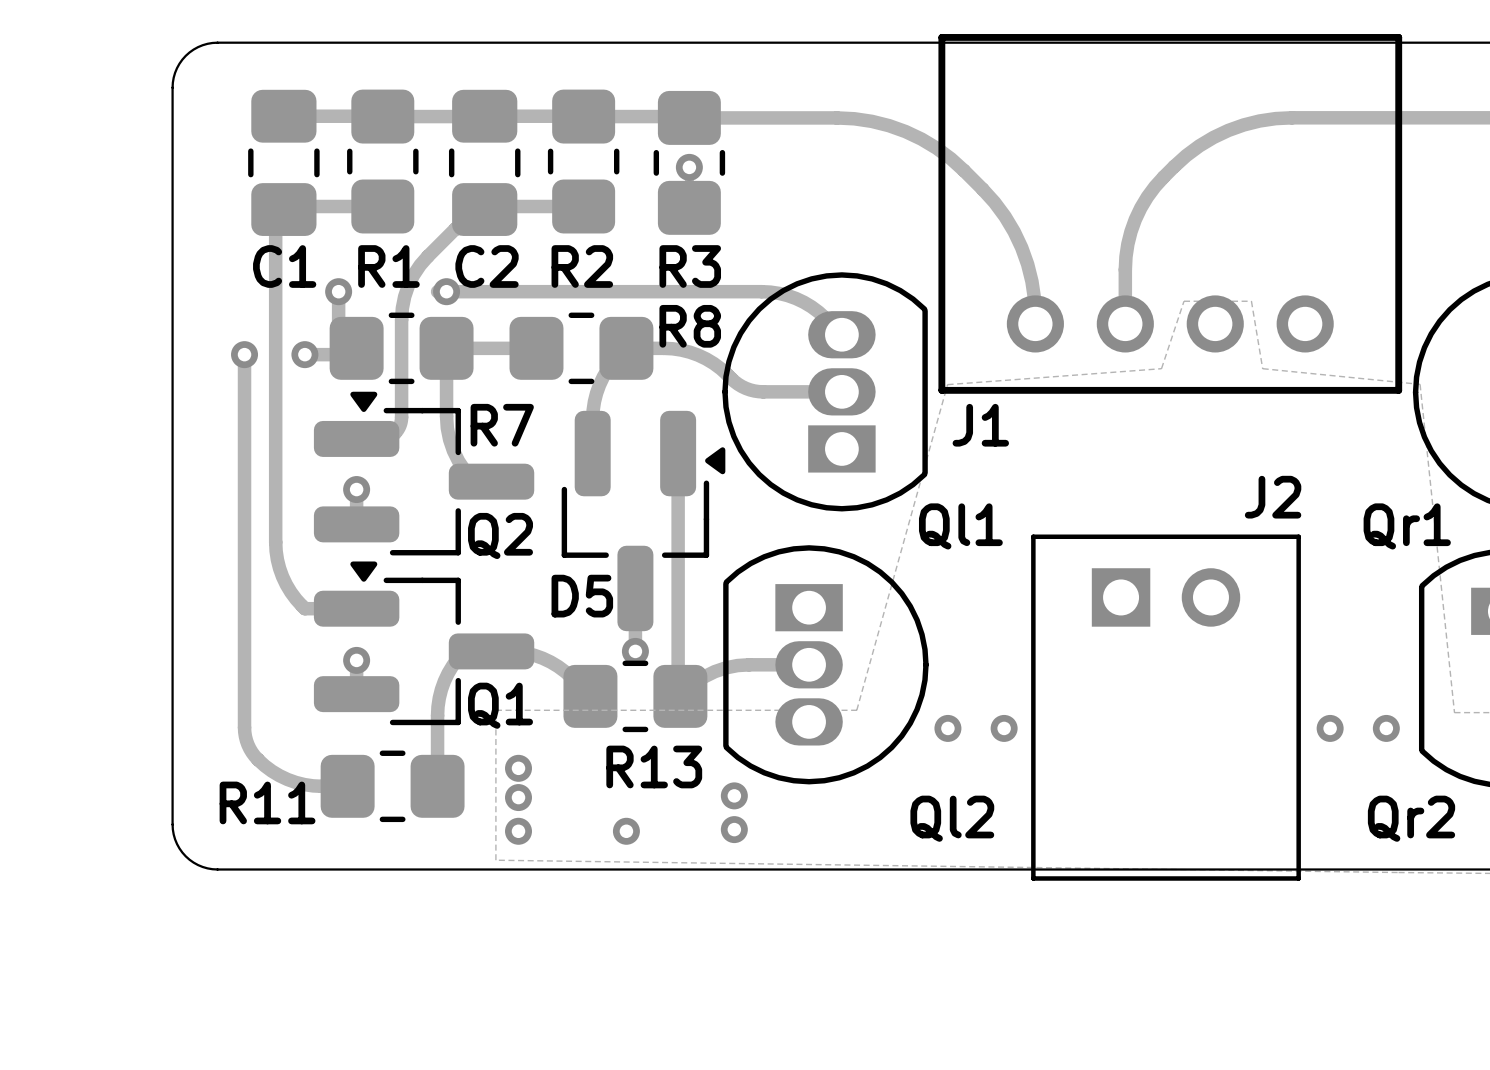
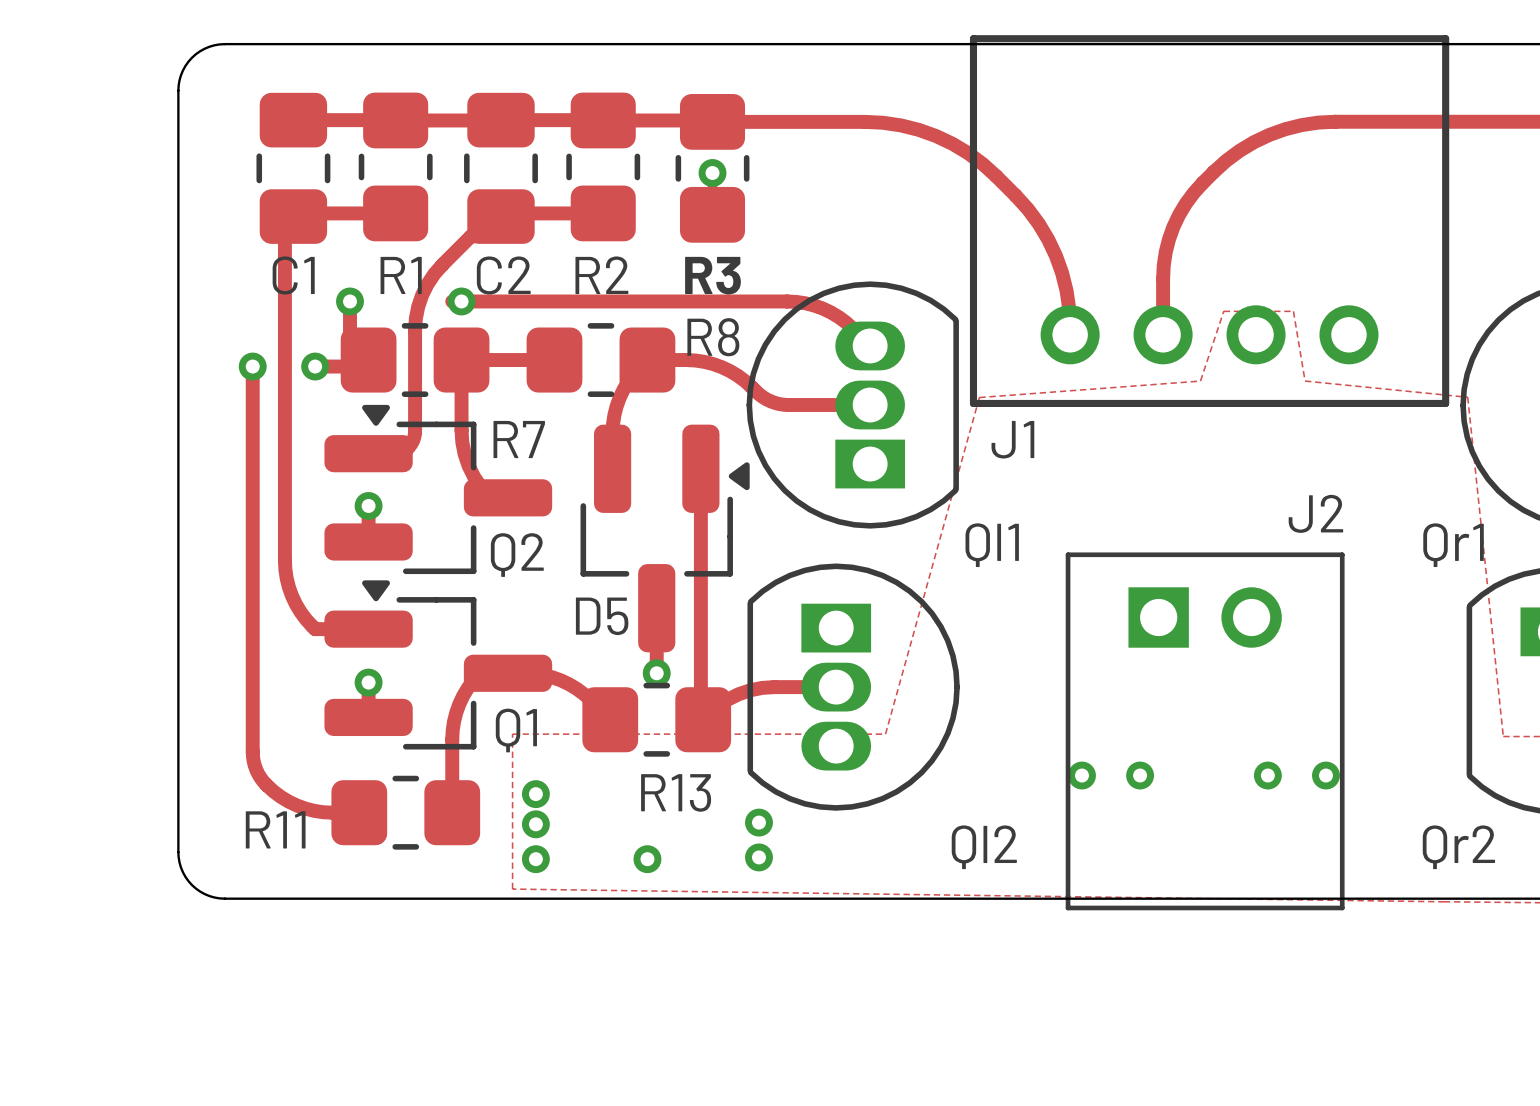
via: (947, 728) -> none
via position: (1004, 728) -> (1081, 775)
via position: (1330, 728) -> (1325, 775)
via: (1386, 728) -> none
via: none -> (1140, 775)
via: none -> (1267, 775)

